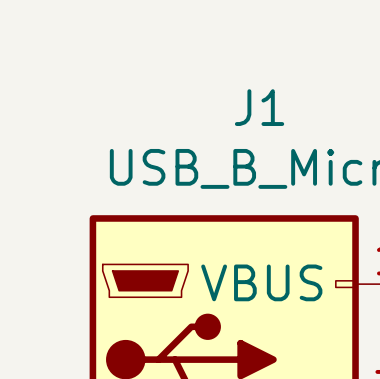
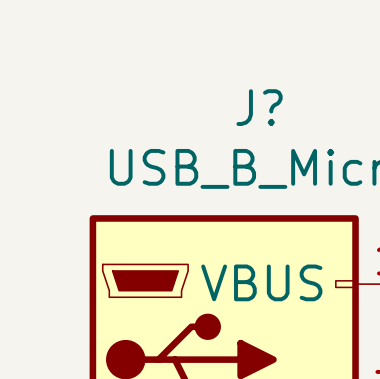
J1 name: J1 (259, 107) -> J? (259, 107)

